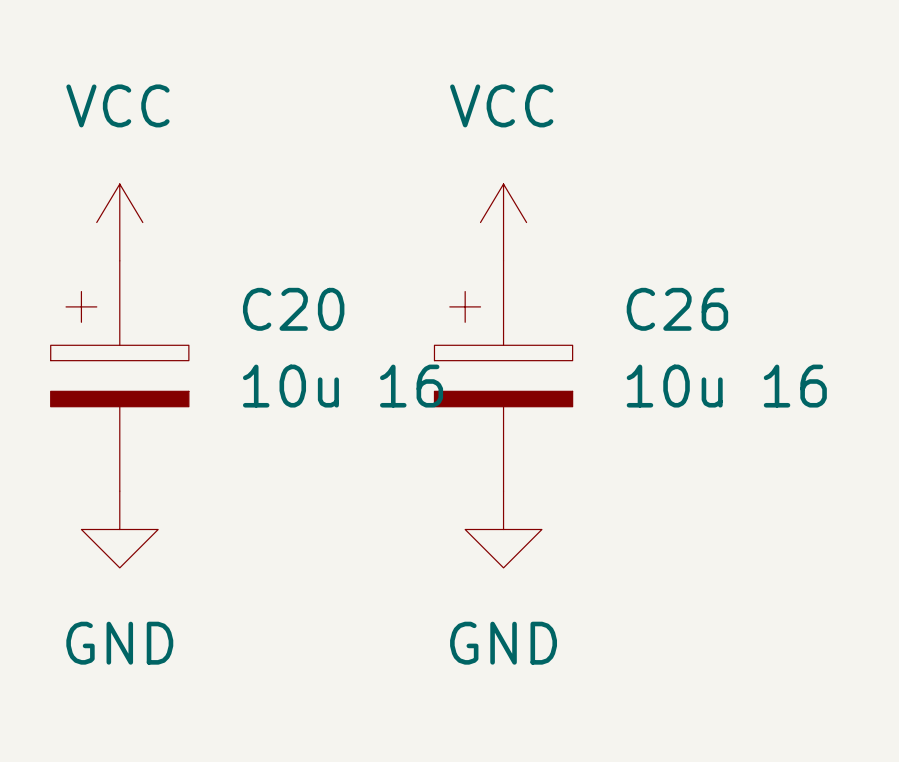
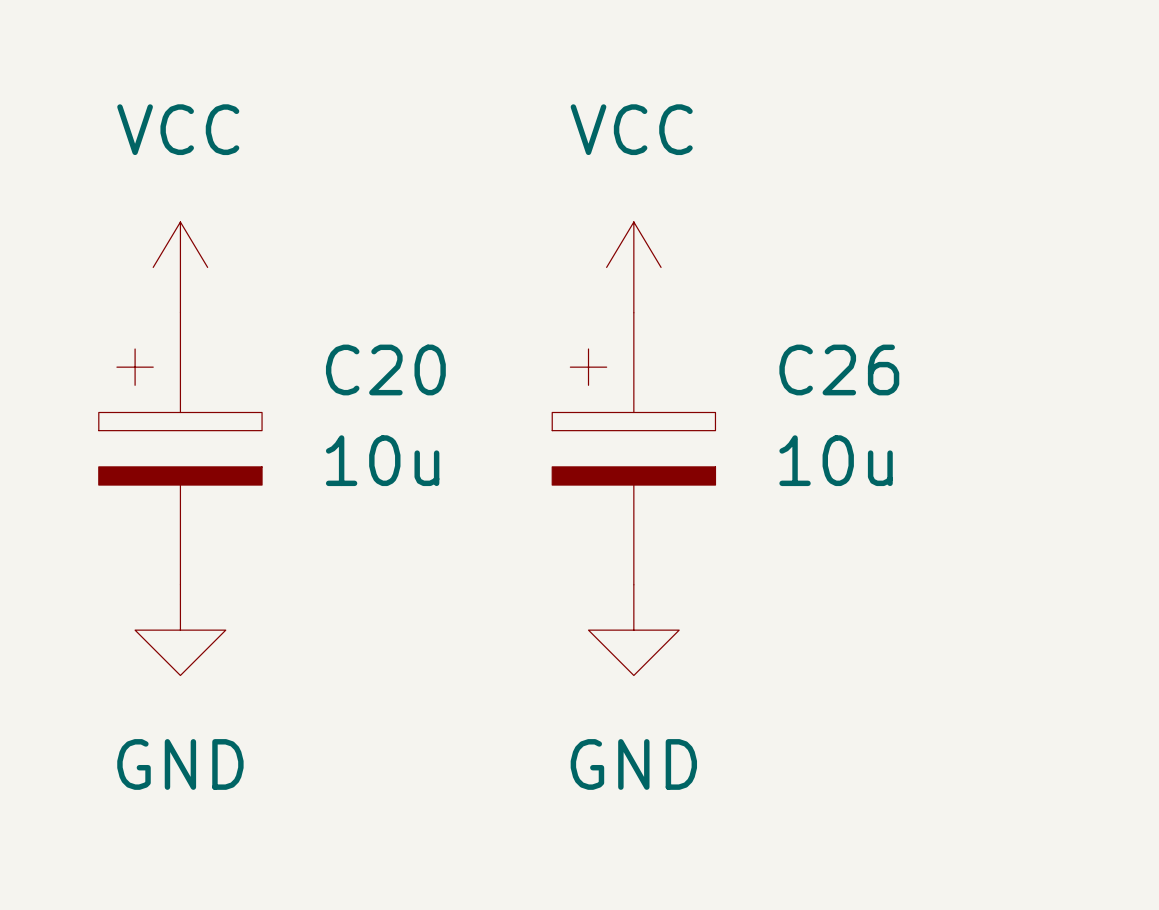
C20 value: 10u 16 (343, 386) -> 10u (382, 460)
C26 value: 10u 16 (726, 386) -> 10u (836, 460)

